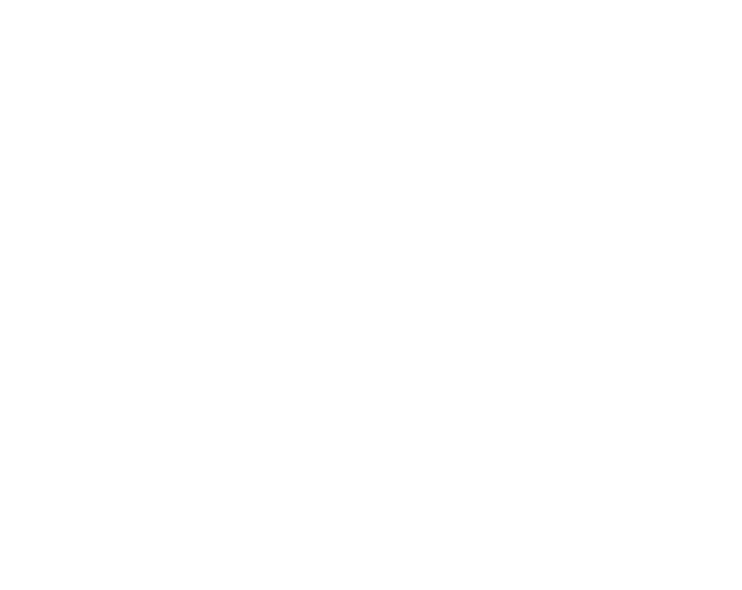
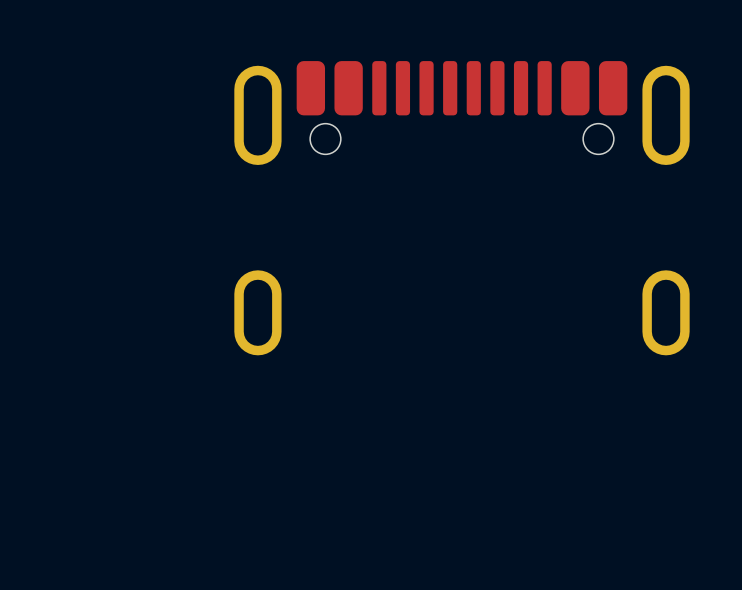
part: none -> (461, 208)

